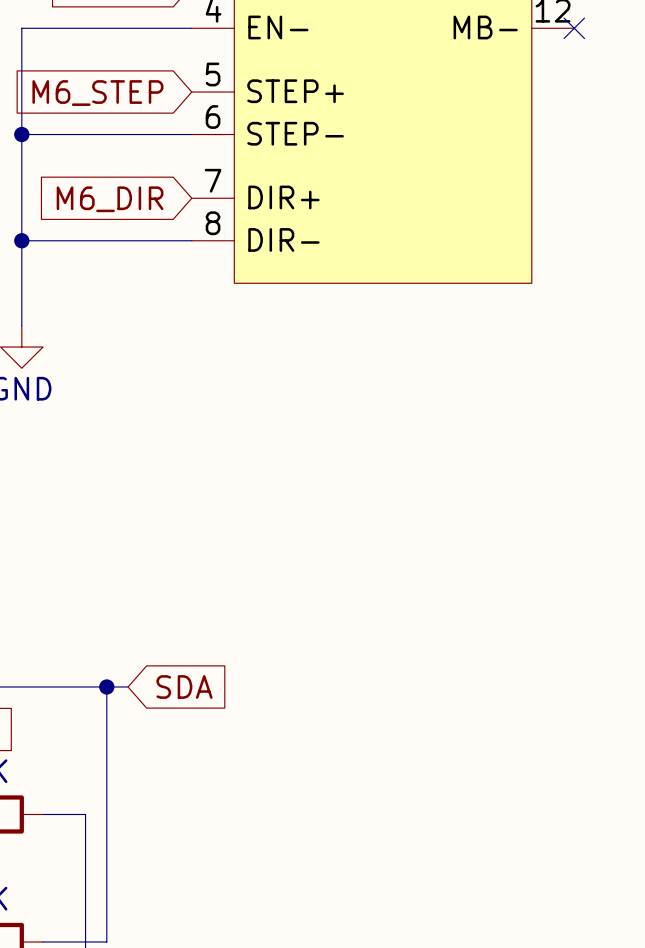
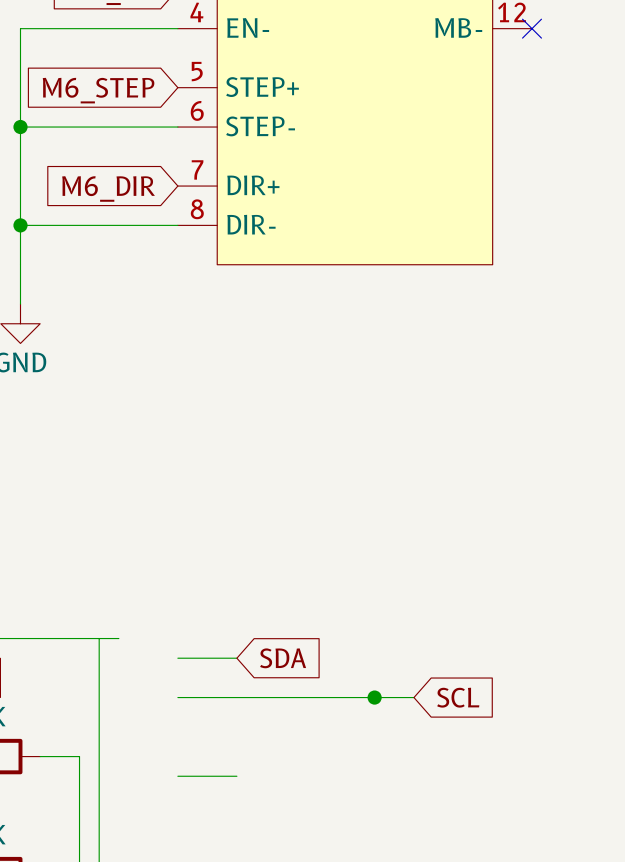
junction: (106, 686) -> none
global label position: SDA (184, 686) -> SDA (283, 658)
wire: none -> (177, 658) (236, 658)
wire: none -> (177, 697) (413, 697)
junction: none -> (374, 697)
global label: none -> SCL (458, 697)
wire: none -> (177, 776) (236, 776)

